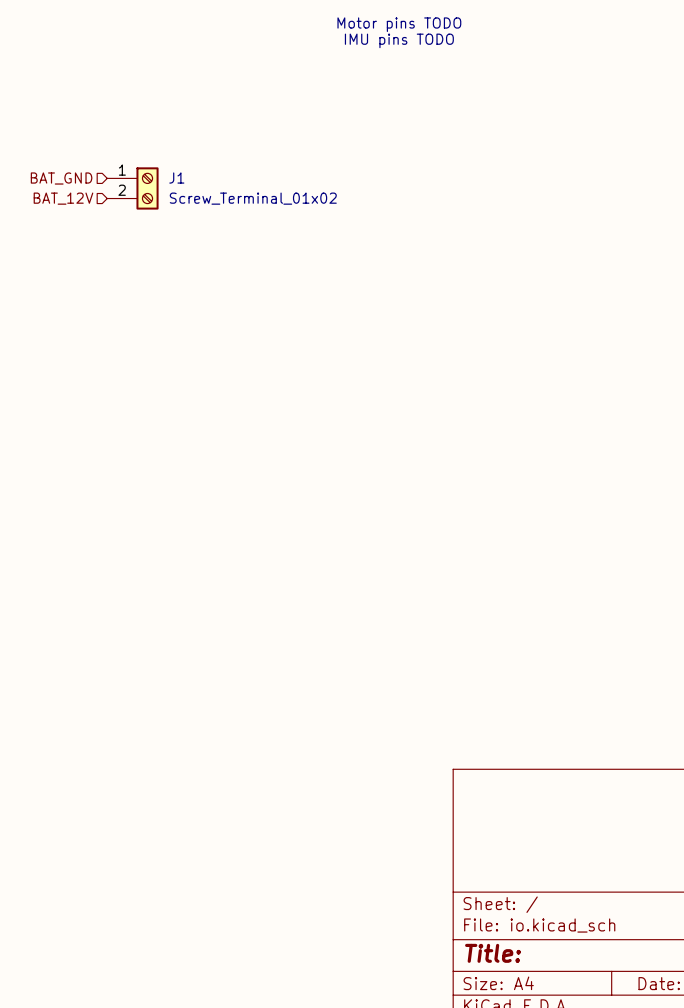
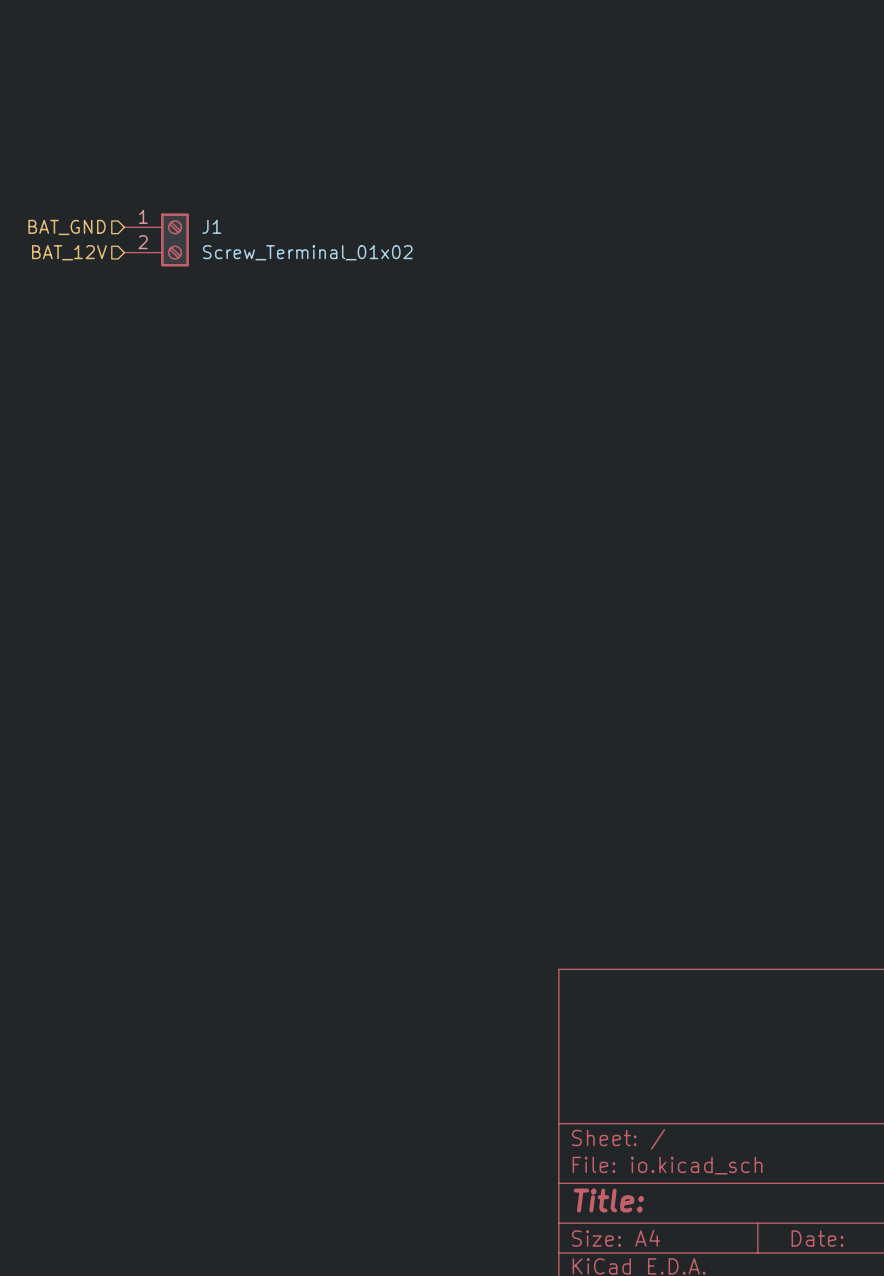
text: Motor pins TODO (399, 24) -> none
text: IMU pins TODO (399, 40) -> none

